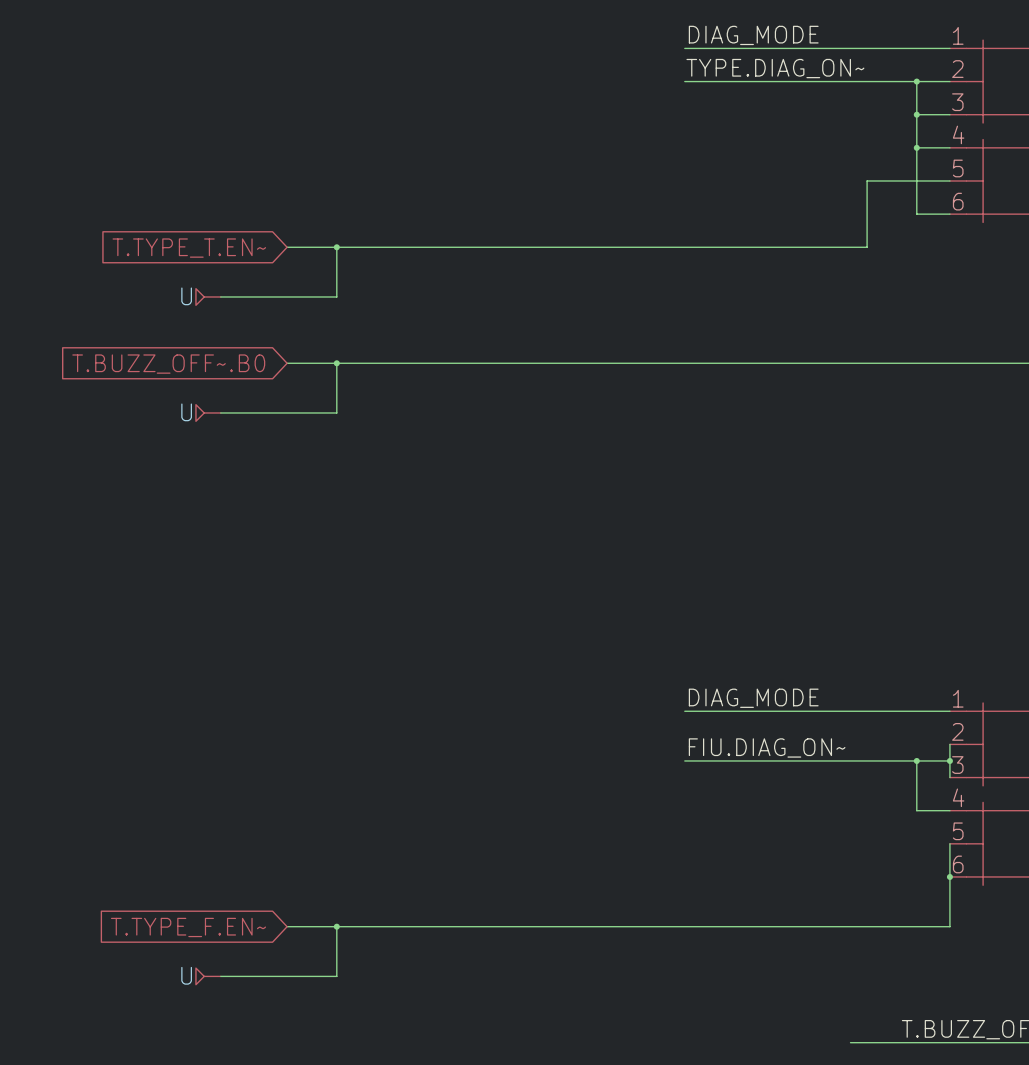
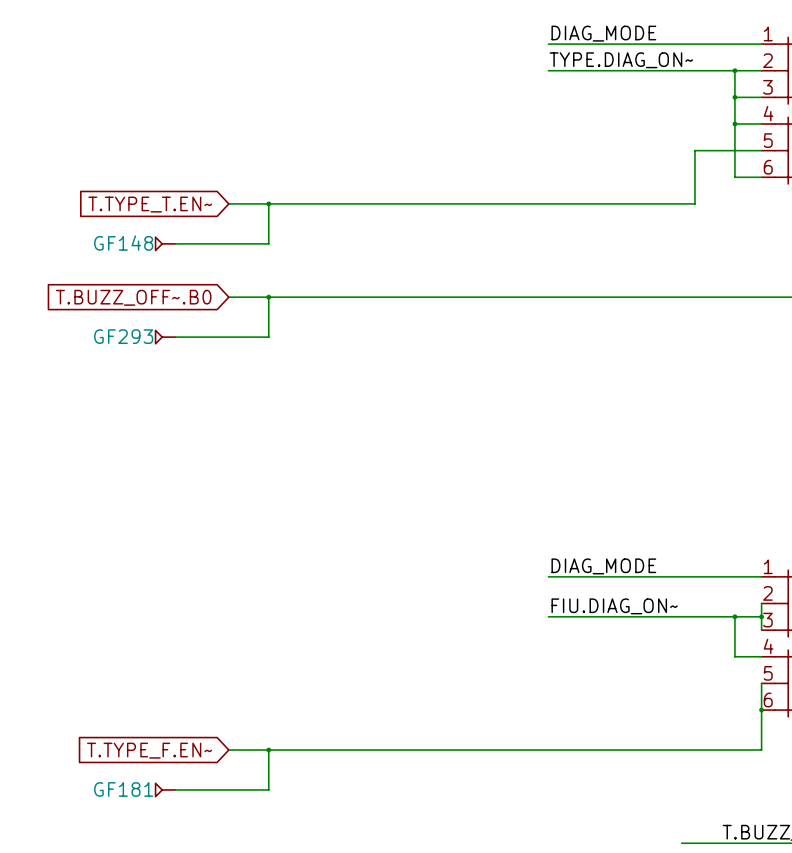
U name: U (186, 296) -> GF148 (123, 243)
U name: U (186, 412) -> GF293 (123, 336)
U name: U (186, 975) -> GF181 (123, 789)

